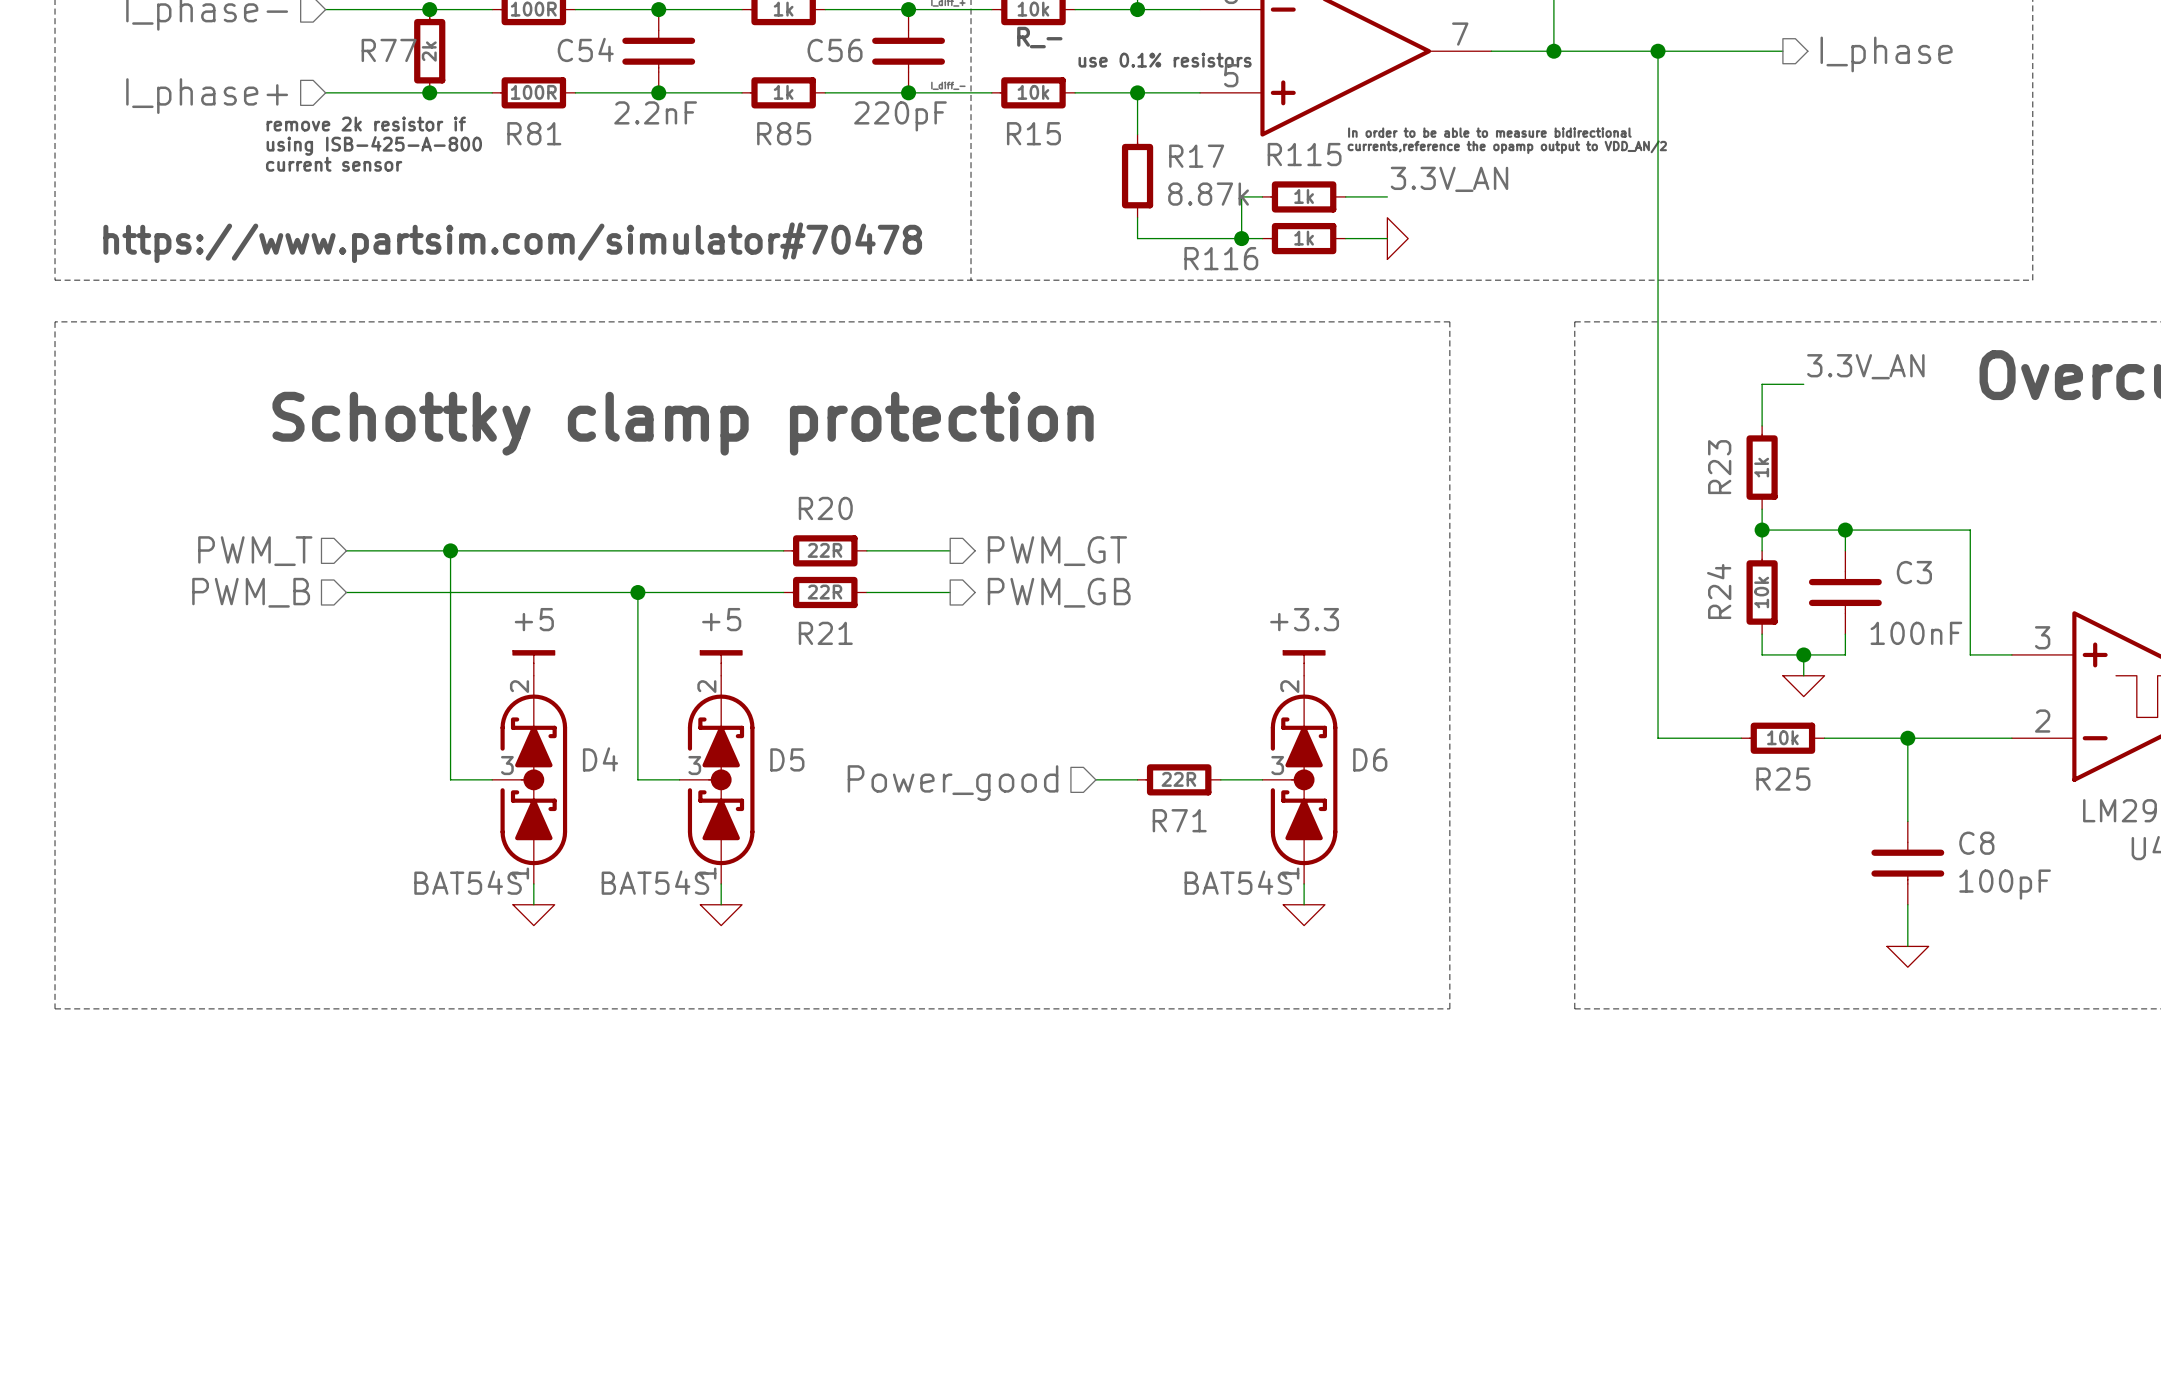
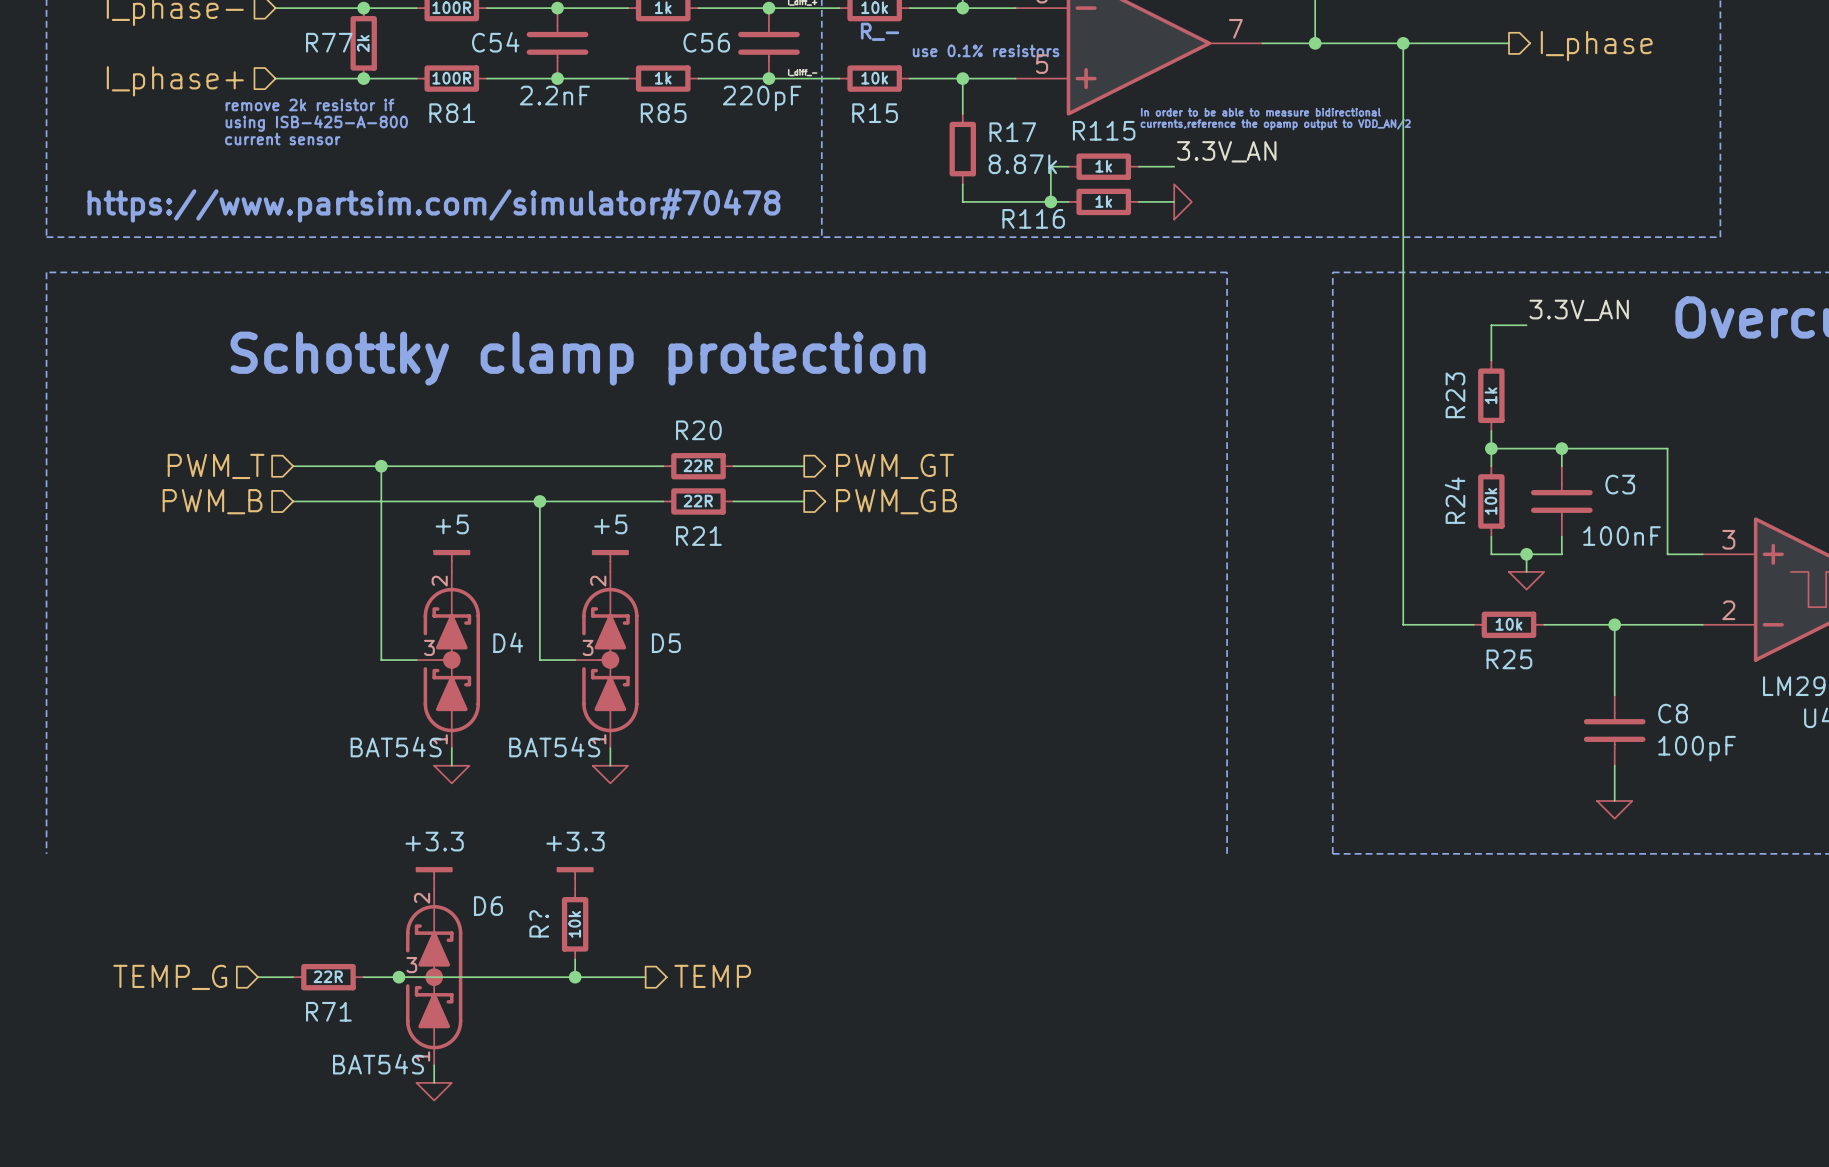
power symbol: +3.3 (1304, 663) -> none
D6 name position: D6 (1370, 759) -> D6 (488, 906)
wire: (1095, 779) (1137, 779) -> none
R71 position: (1179, 779) -> (328, 977)
wire: (1220, 779) (1262, 779) -> none
D6 position: (1299, 779) -> (430, 977)
hierarchical label: Power_good (953, 783) -> none
wire: (1304, 883) (1304, 904) -> none
power symbol: (1304, 915) -> none
line: (55, 1008) (1449, 1008) -> none
power symbol: none -> +3.3 (434, 878)
power symbol: none -> +3.3 (575, 878)
R?: none -> 10k (575, 924)
wire: none -> (575, 959) (575, 977)
hierarchical label: none -> TEMP (712, 976)
hierarchical label: none -> TEMP_G (170, 977)
wire: none -> (257, 977) (293, 977)
wire: none -> (363, 977) (645, 977)
junction: none -> (398, 977)
junction: none -> (575, 977)
wire: none -> (434, 1065) (434, 1082)
power symbol: none -> (434, 1091)

